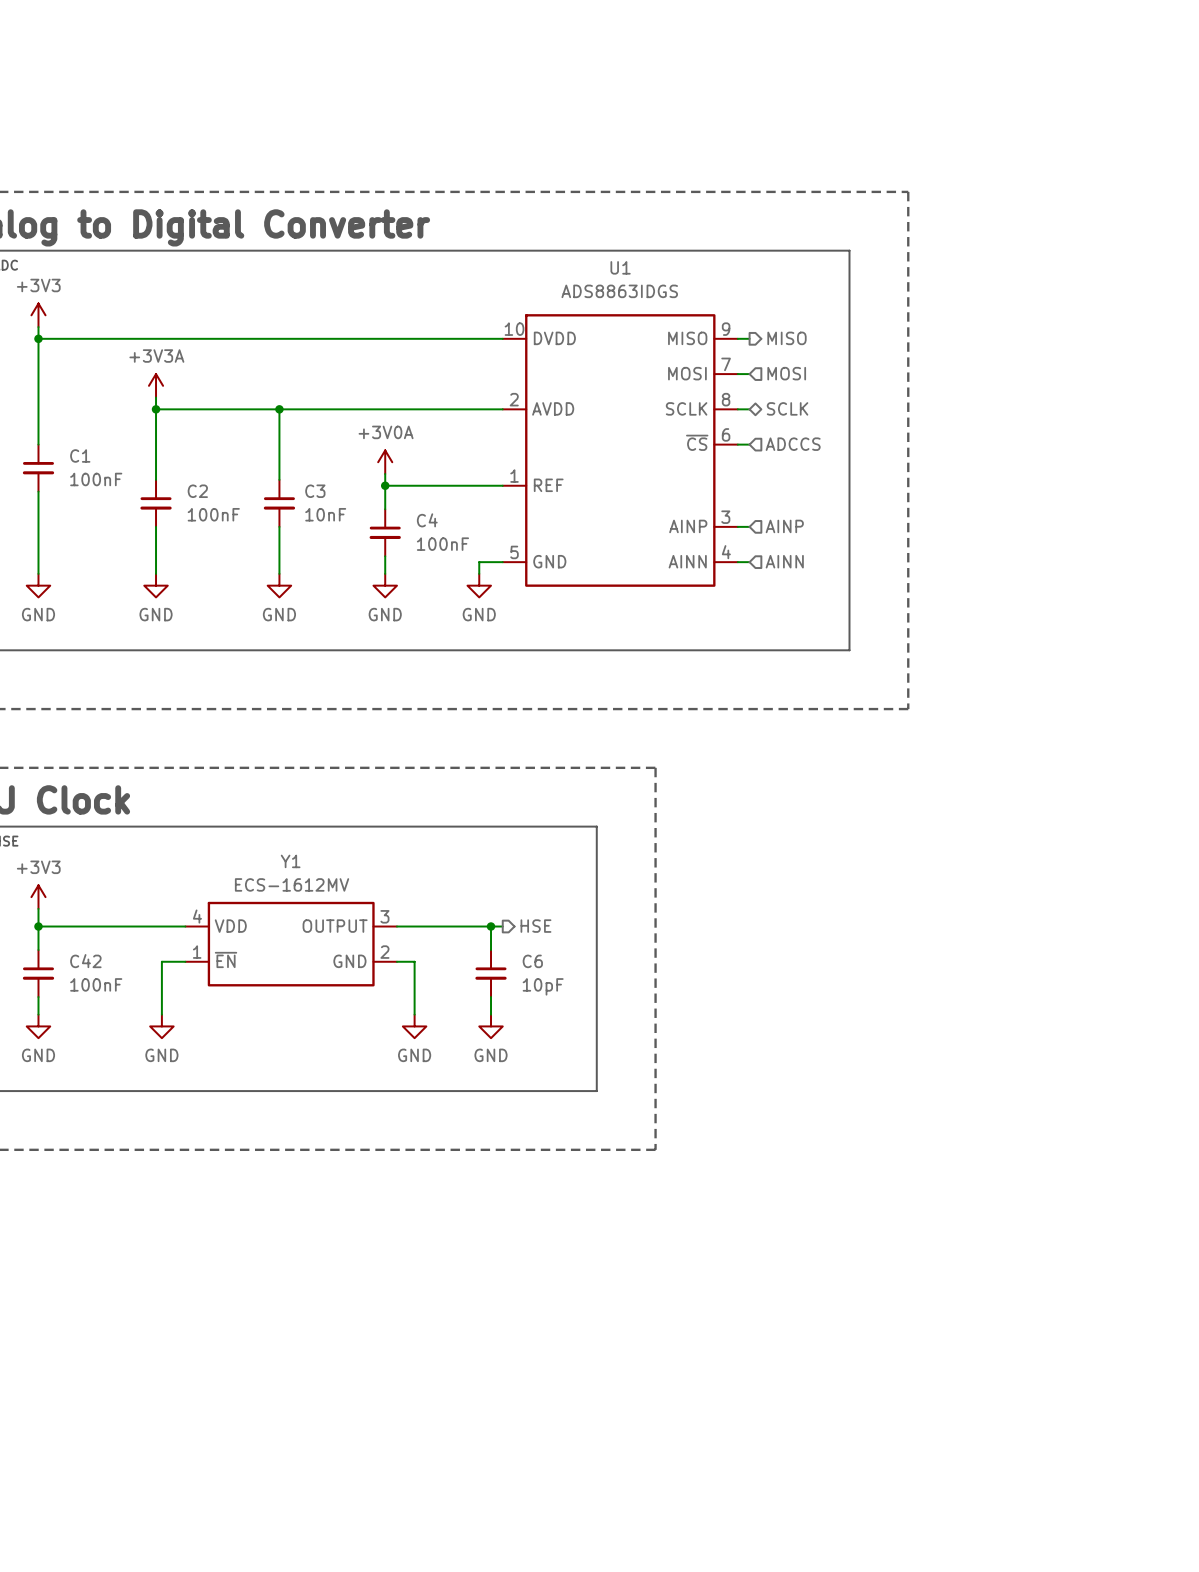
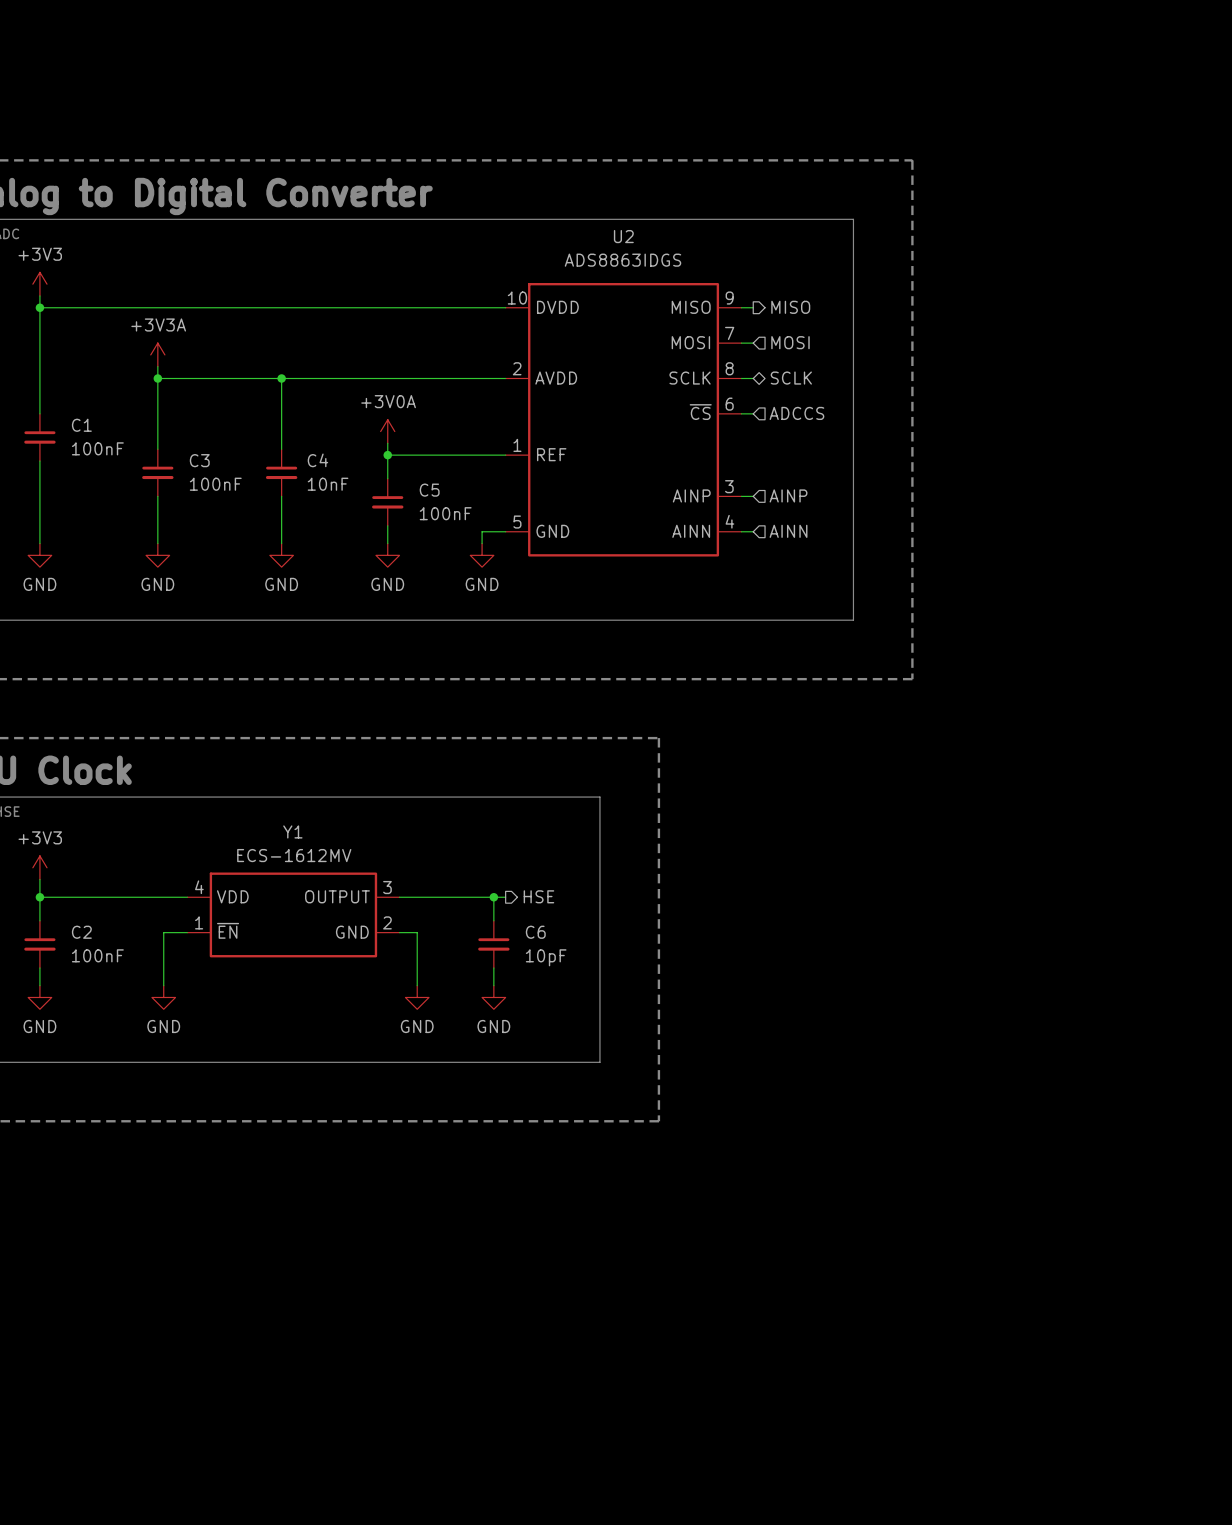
U1 name: U1 (620, 267) -> U2 (623, 236)
C2 name: C2 (197, 491) -> C3 (199, 460)
C3 name: C3 (315, 491) -> C4 (317, 460)
C4 name: C4 (427, 520) -> C5 (429, 490)
C42 name: C42 (85, 961) -> C2 (81, 932)

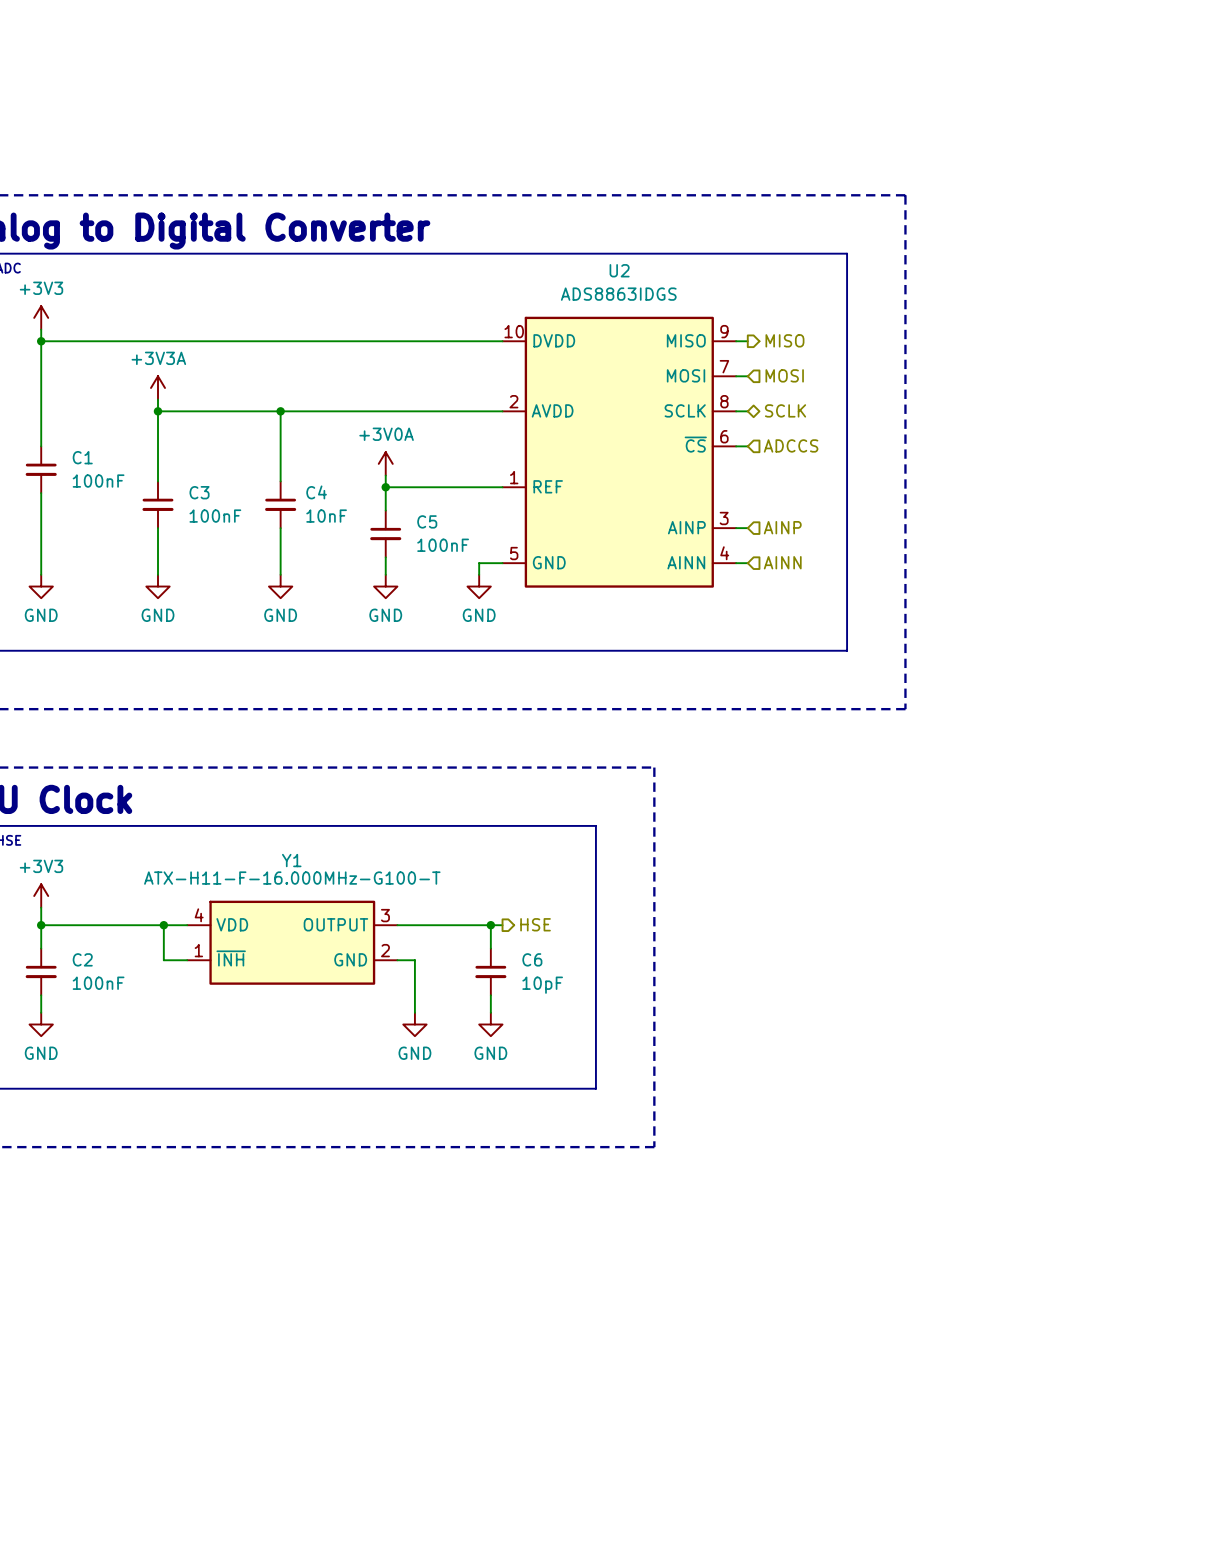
Y1 value: ECS-1612MV (294, 855) -> ATX-H11-F-16.000MHz-G100-T (292, 878)
junction: none -> (163, 925)
Y1 pin name: ~{EN} (228, 930) -> ~{INH} (231, 958)
wire: (163, 932) (163, 985) -> (163, 960) (163, 925)
power symbol: GND (163, 997) -> none

